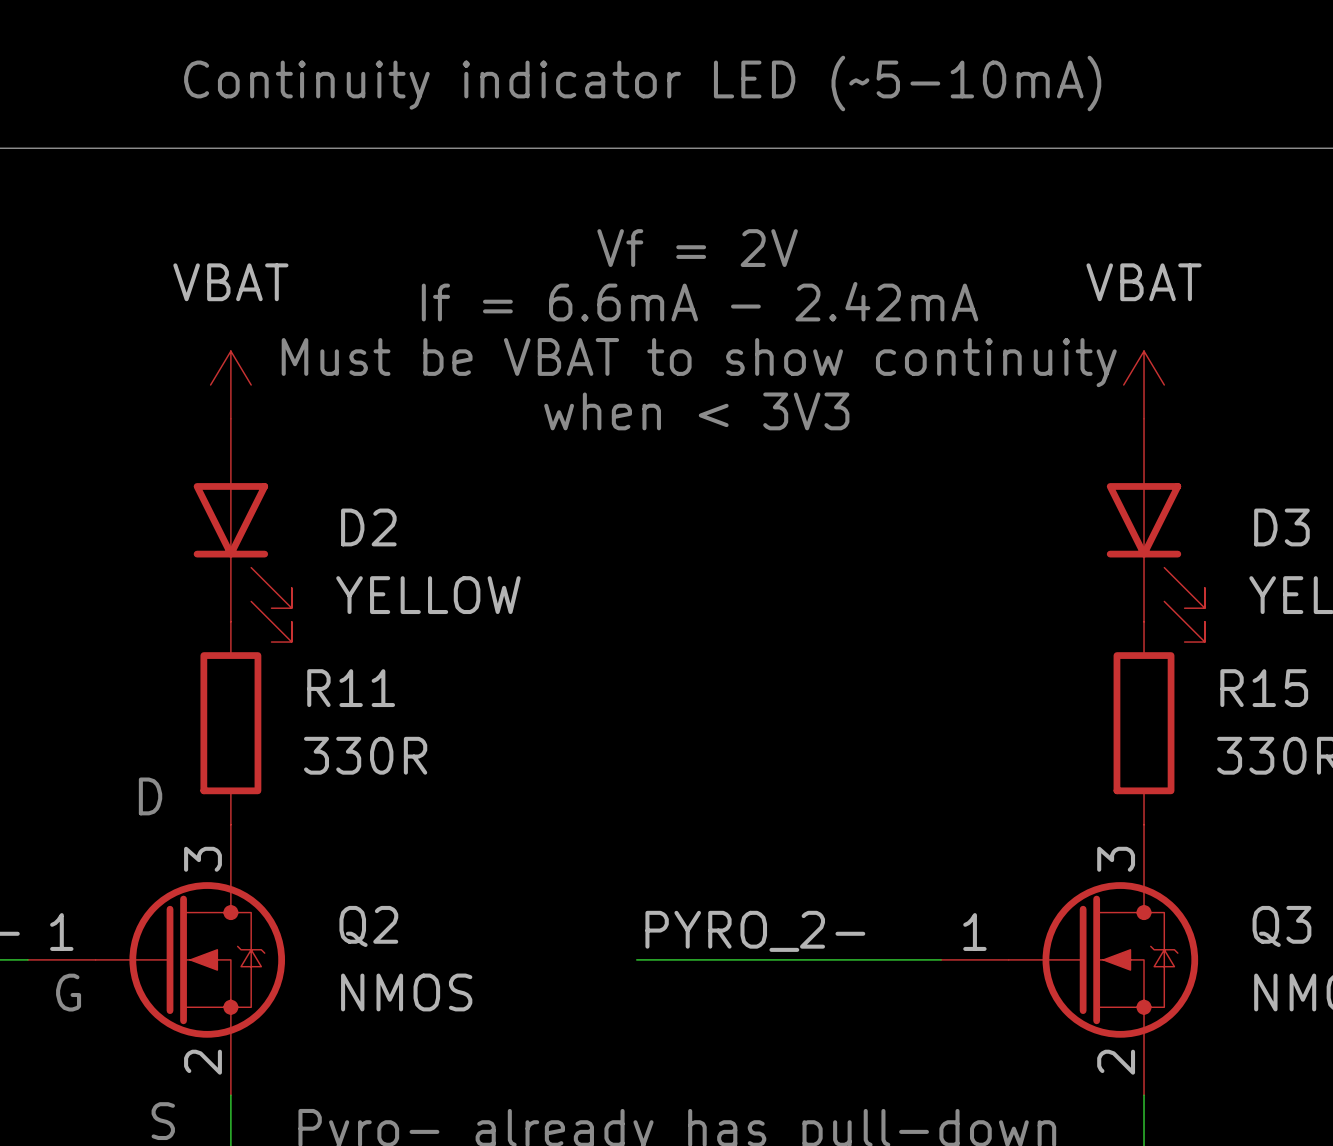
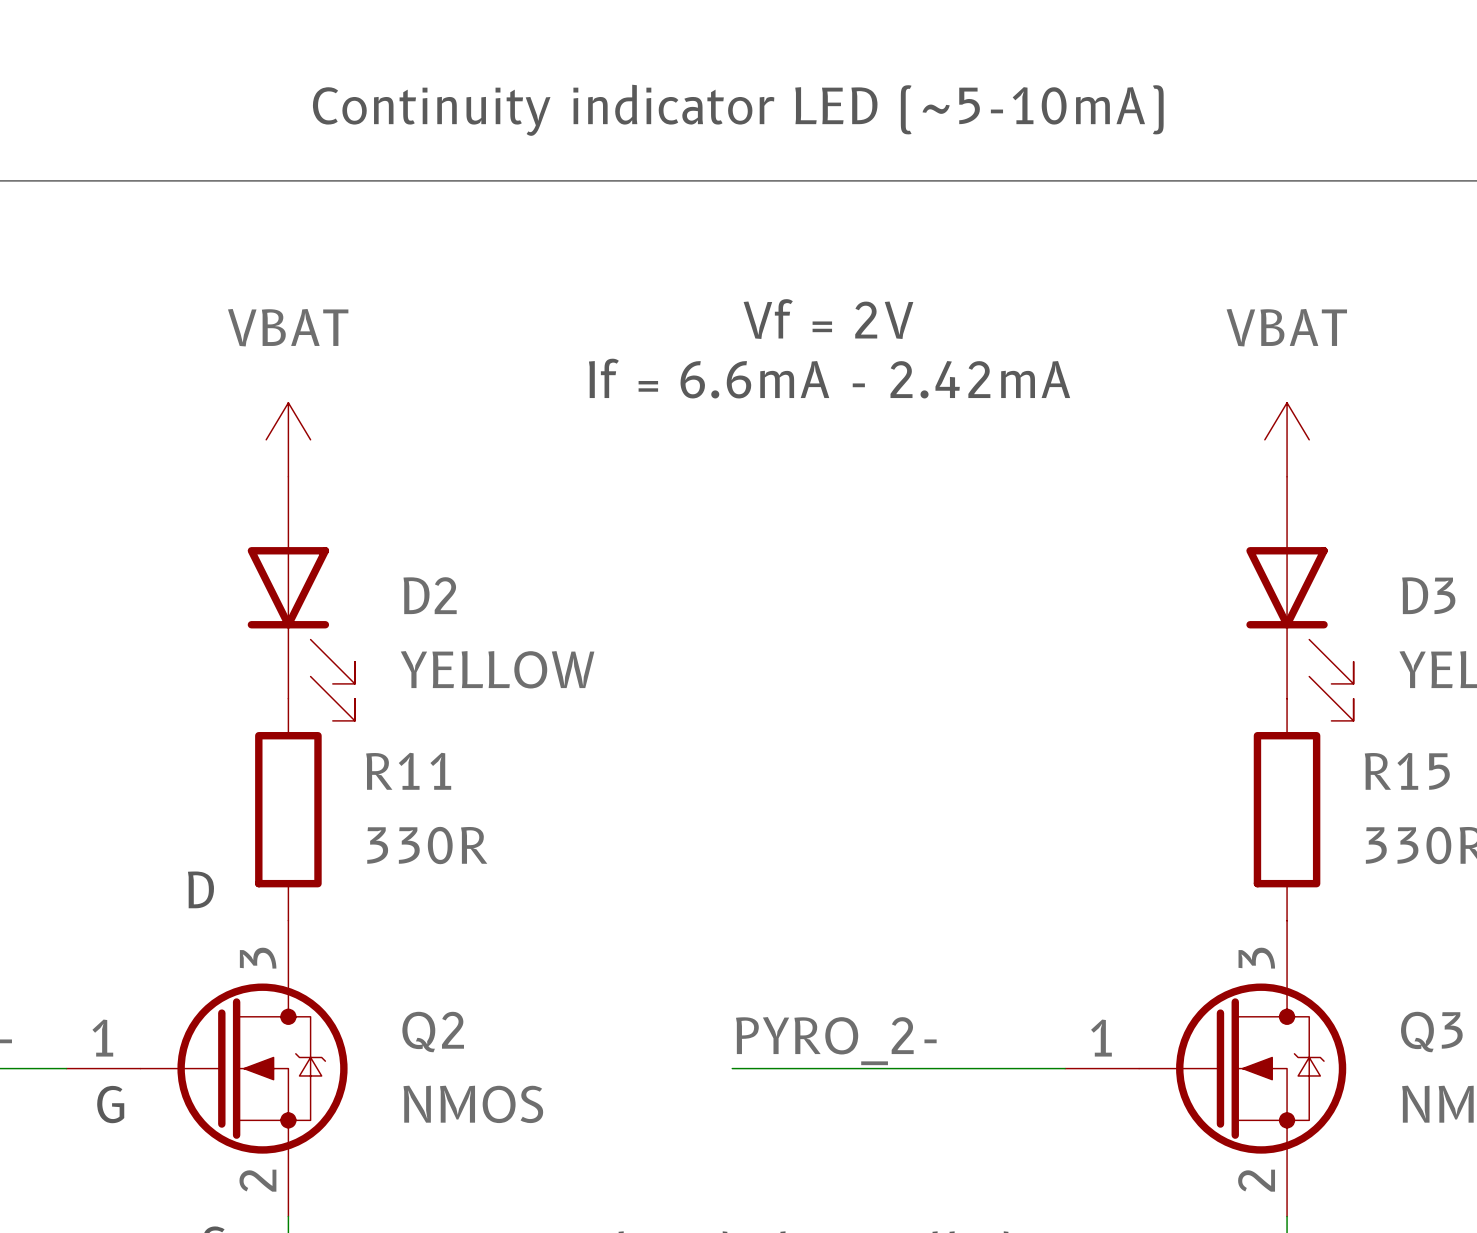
text position: Vf = 2V (697, 248) -> Vf = 2V (828, 319)
text position: If = 6.6mA - 2.42mA (700, 301) -> If = 6.6mA - 2.42mA (829, 378)
text: Must be VBAT to show continuity (699, 362) -> none
text: when < 3V3 (696, 411) -> none

